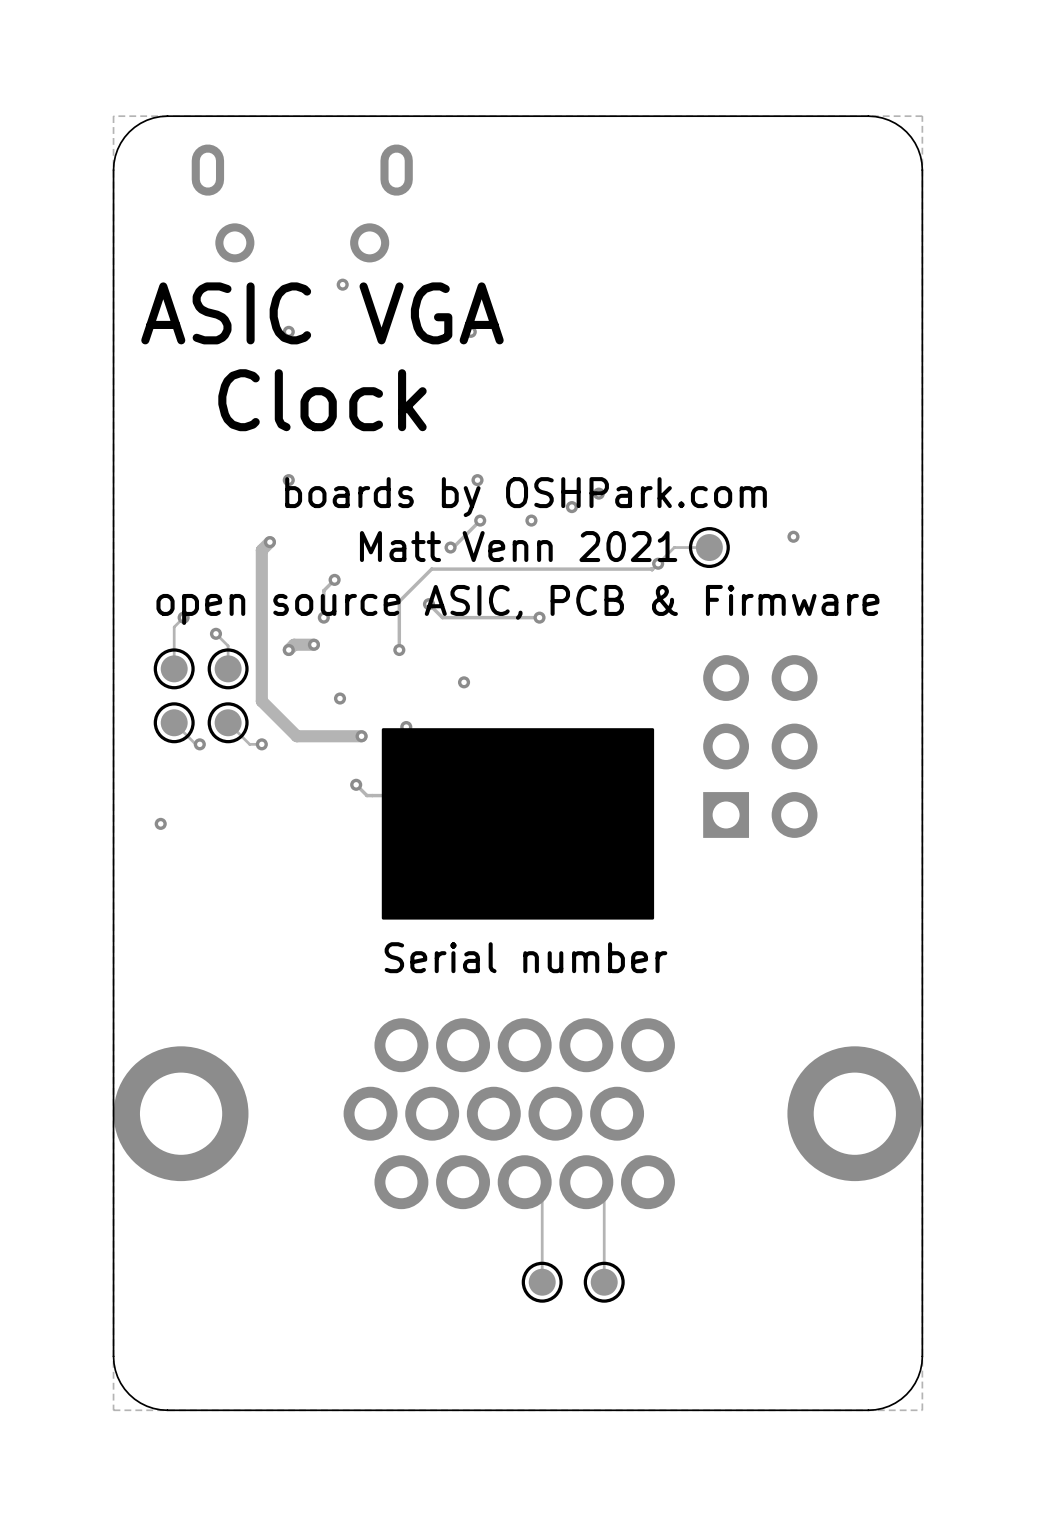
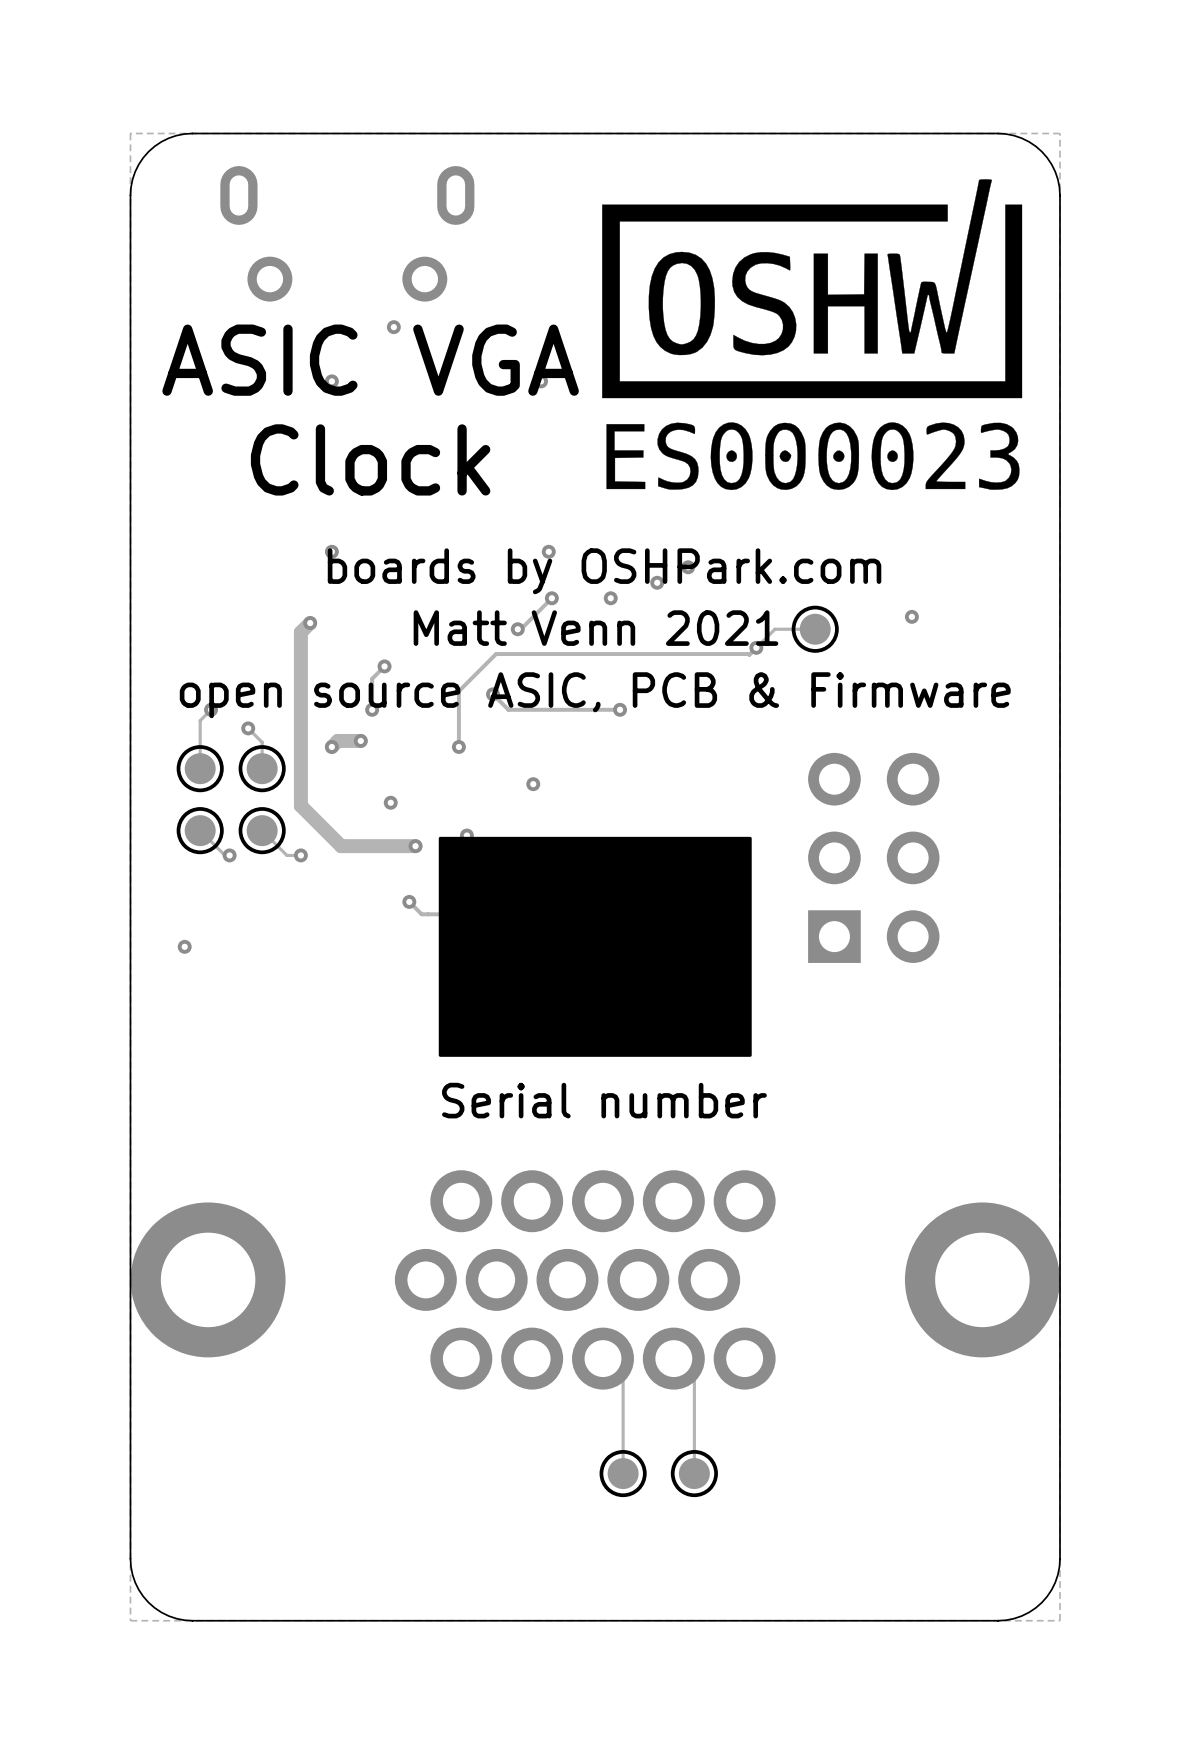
drawing: none -> [602, 179, 1023, 491]

